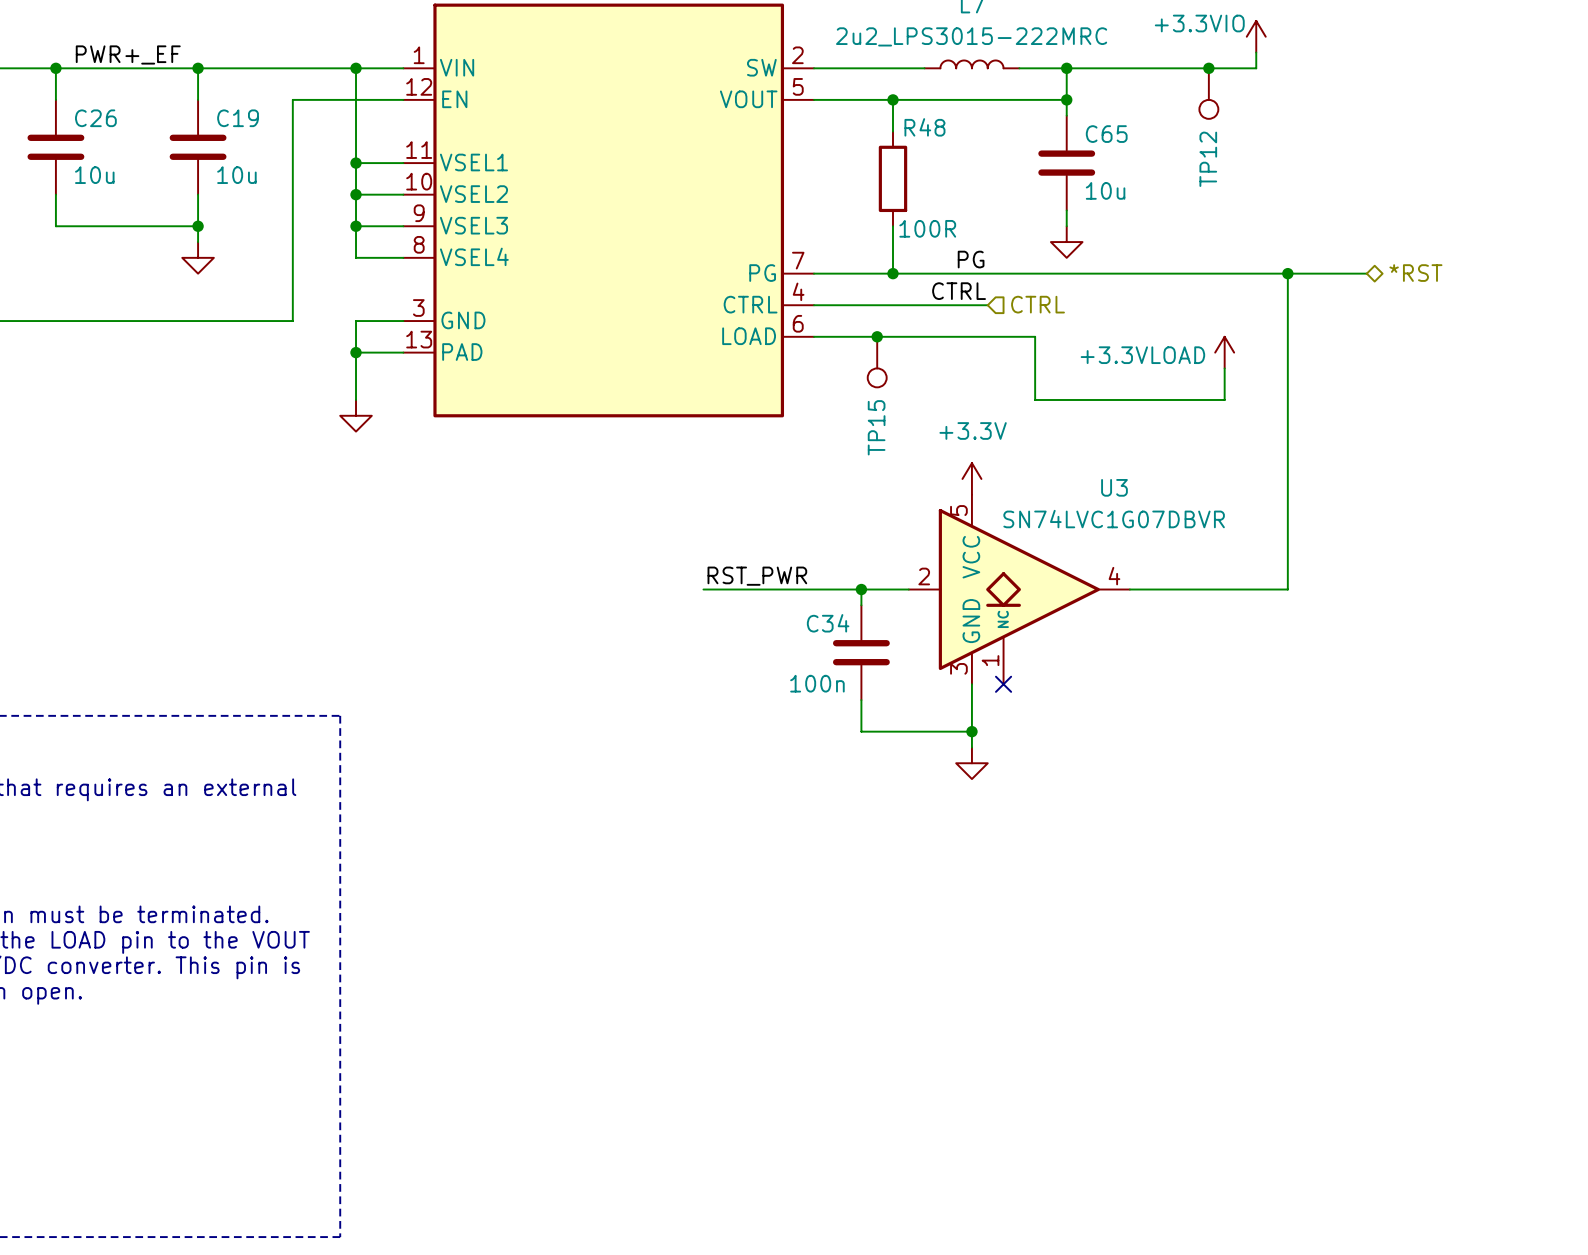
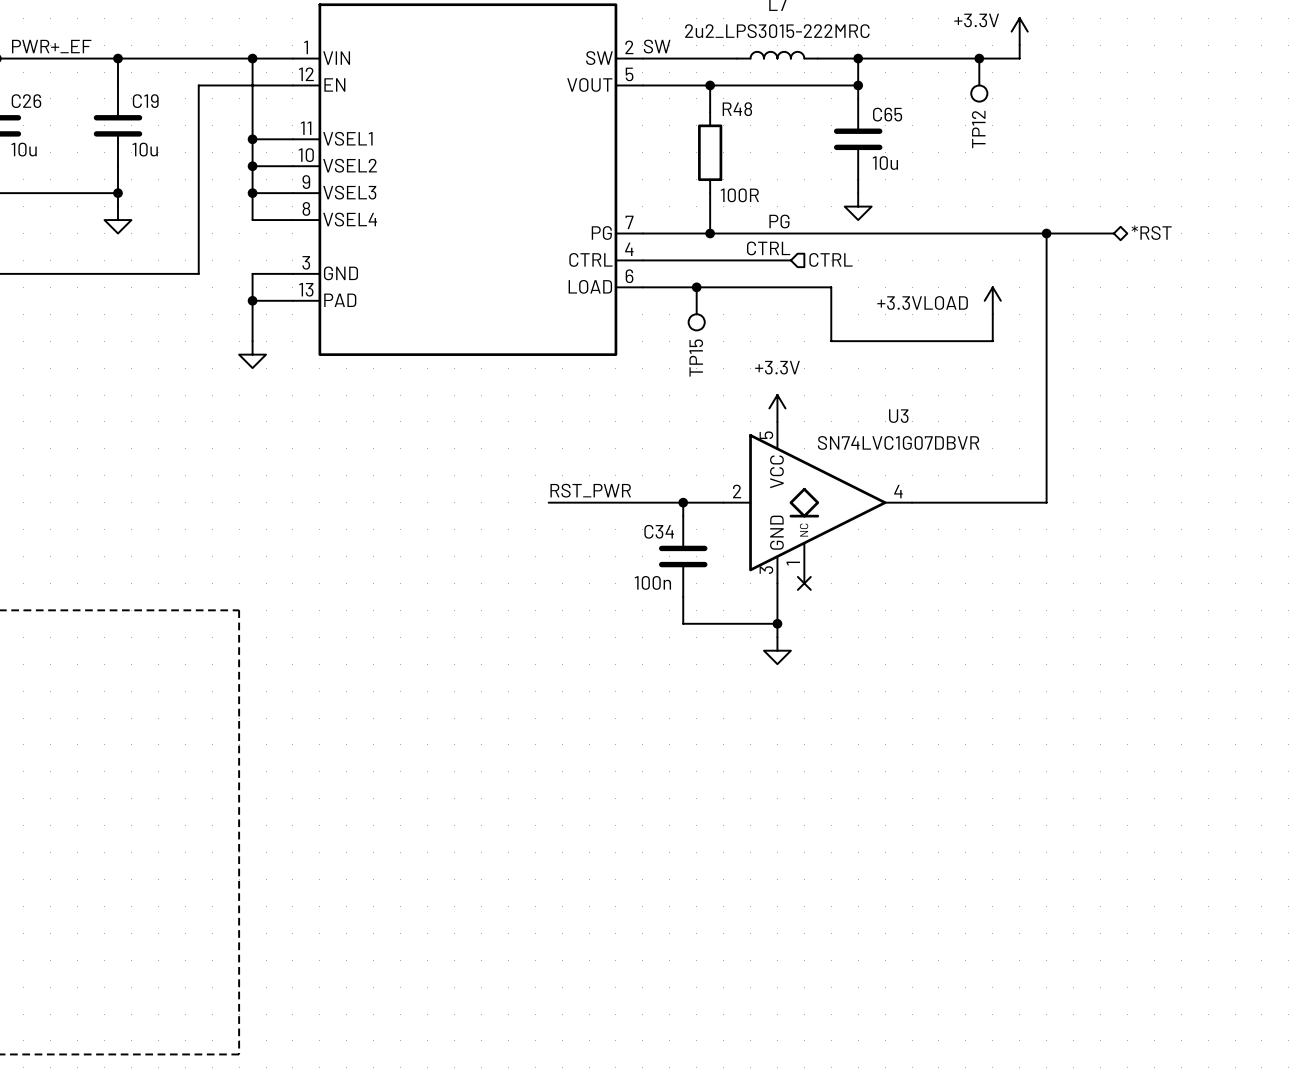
power symbol: +3.3VIO (1256, 36) -> +3.3V (1019, 31)
label: none -> SW (657, 46)

